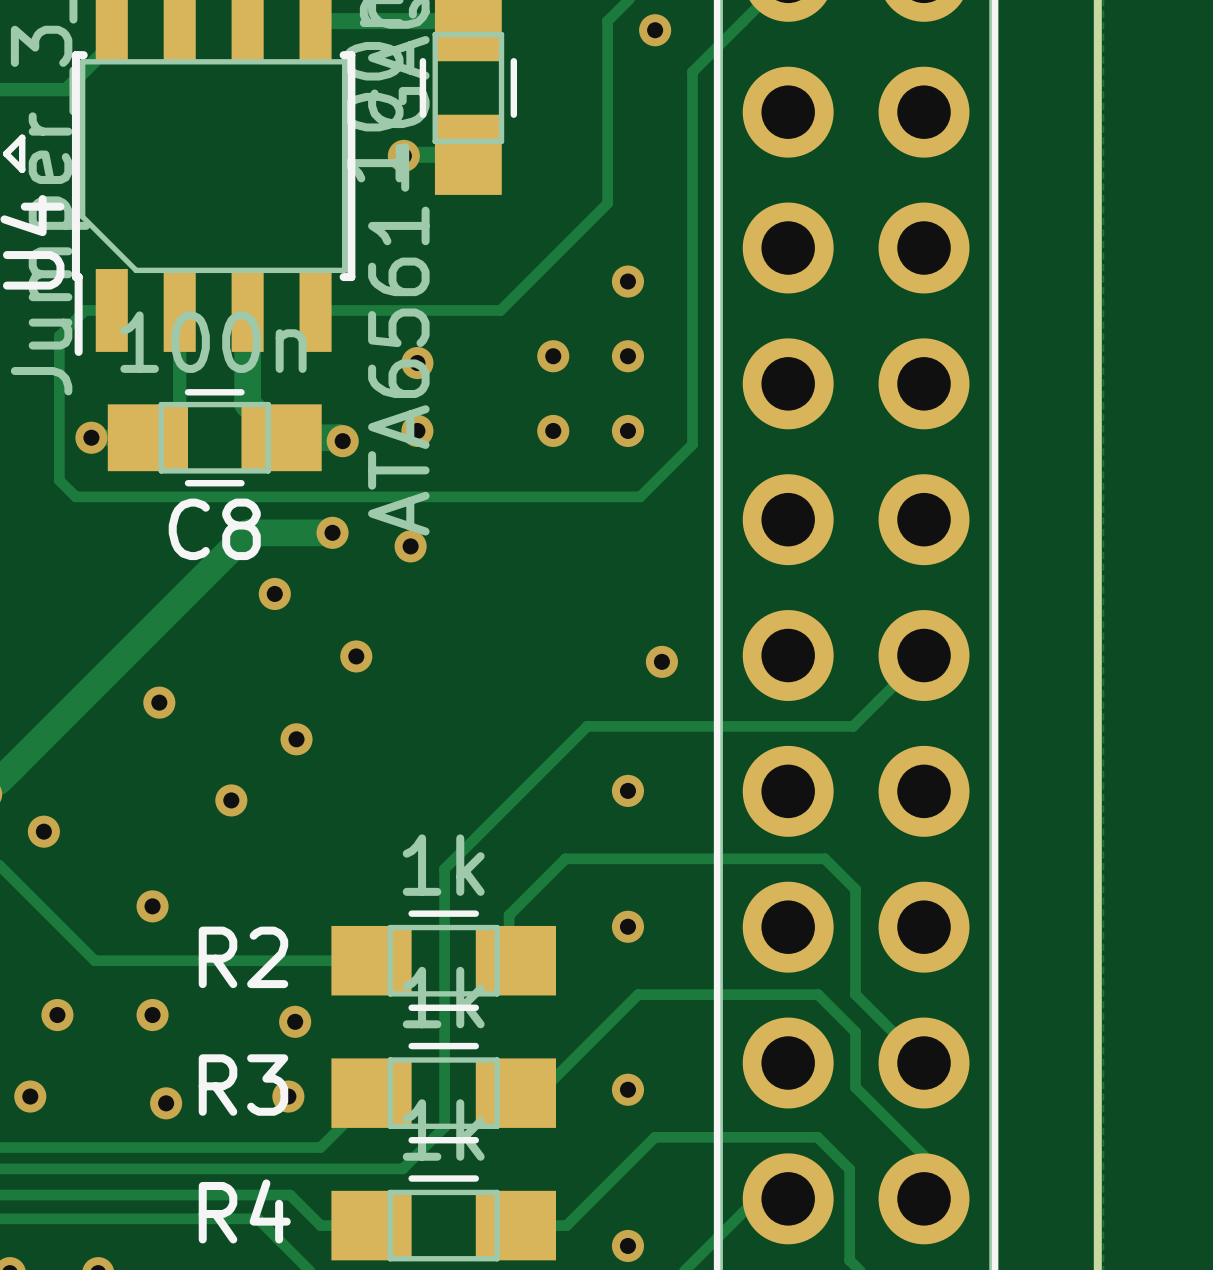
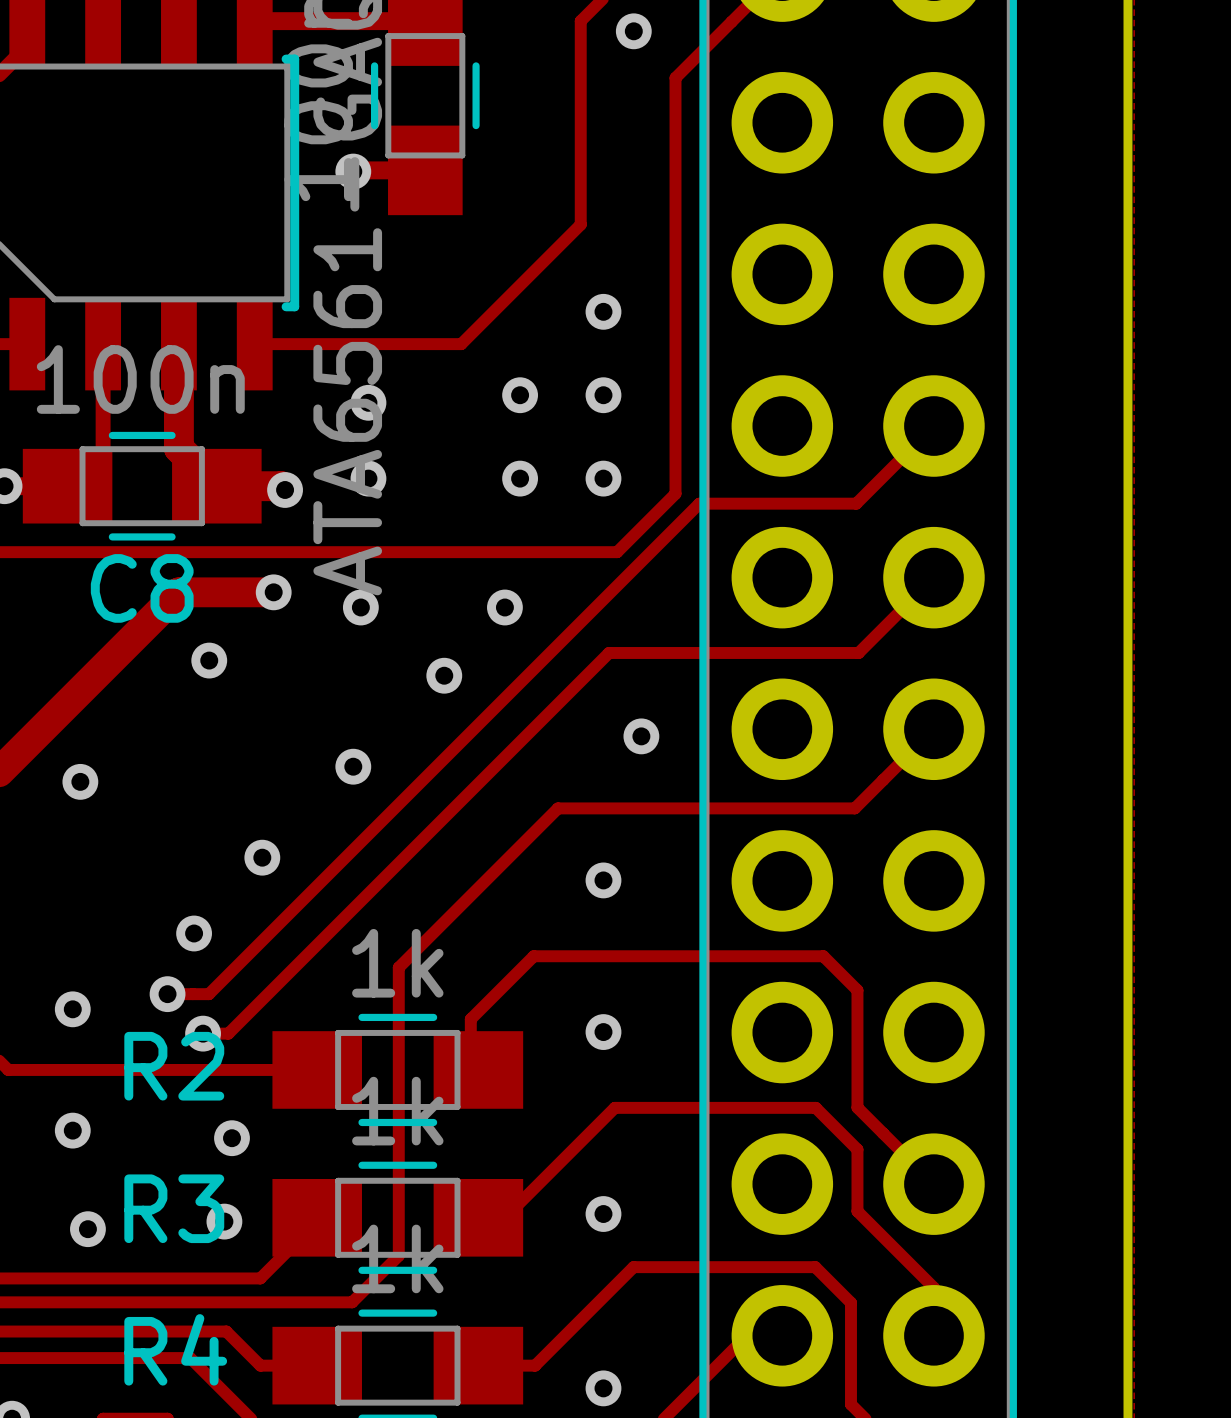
track: none -> (933, 426) (856, 503) (699, 503) (208, 994) (167, 994)
track: none -> (933, 577) (858, 652) (609, 652) (228, 1033) (203, 1033)
via: none -> (504, 607)
via: none -> (444, 675)
via position: (356, 656) -> (353, 766)
via position: (296, 739) -> (262, 857)
via: (231, 800) -> none
via: none -> (194, 933)
via: none -> (167, 994)
via: none -> (203, 1033)

